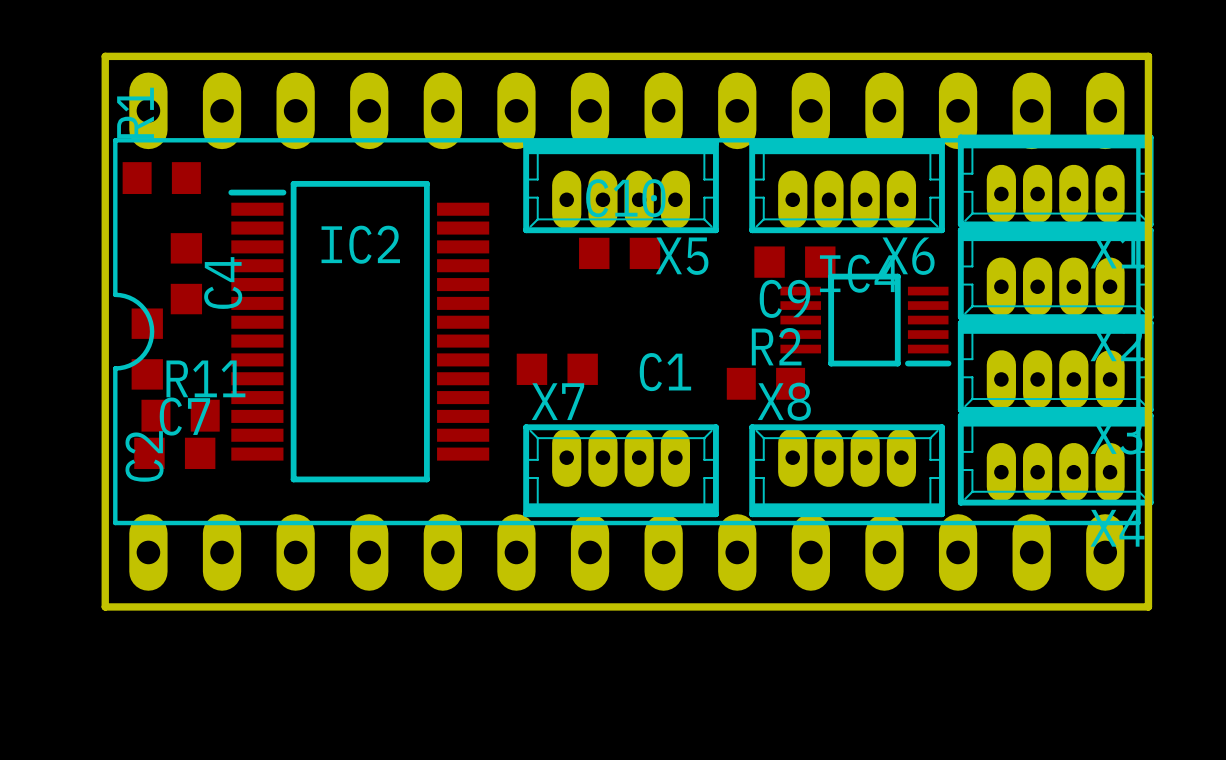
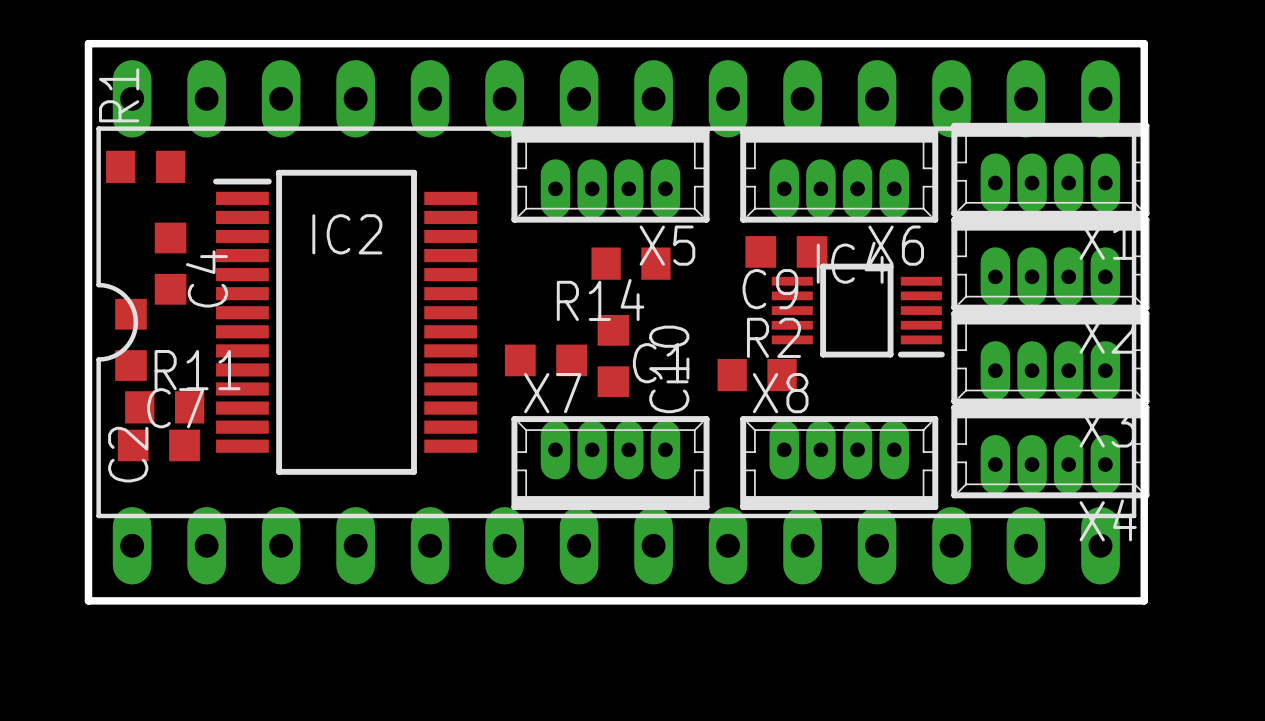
C10 rotation: 0° (619, 253) -> 90° clockwise (613, 356)
C10 position: (619, 253) -> (613, 356)
R14: none -> (631, 263)

